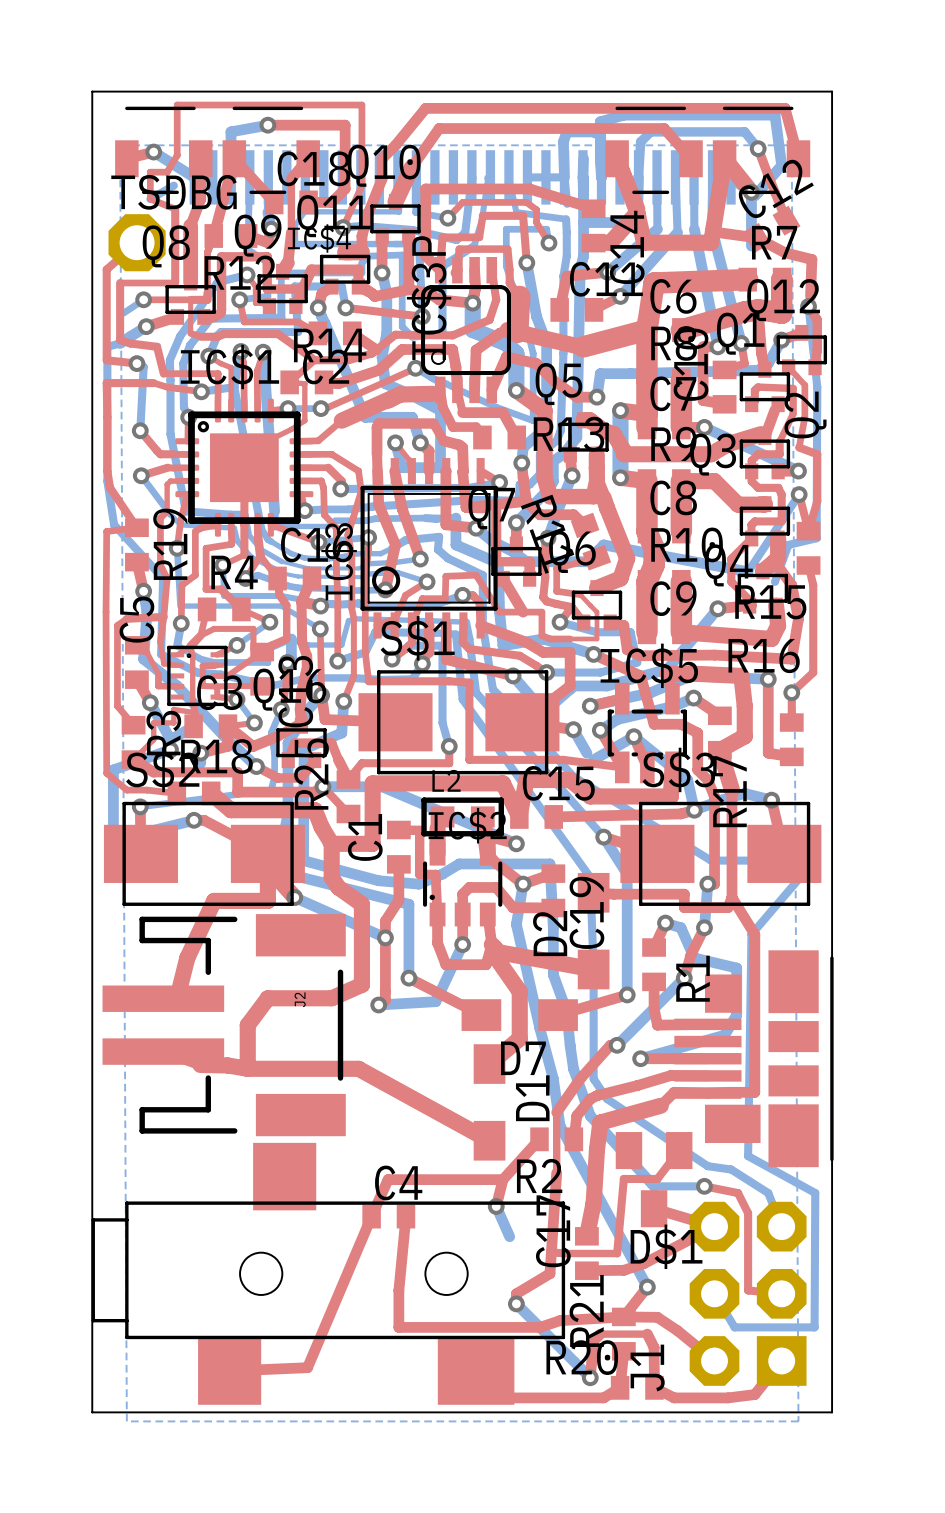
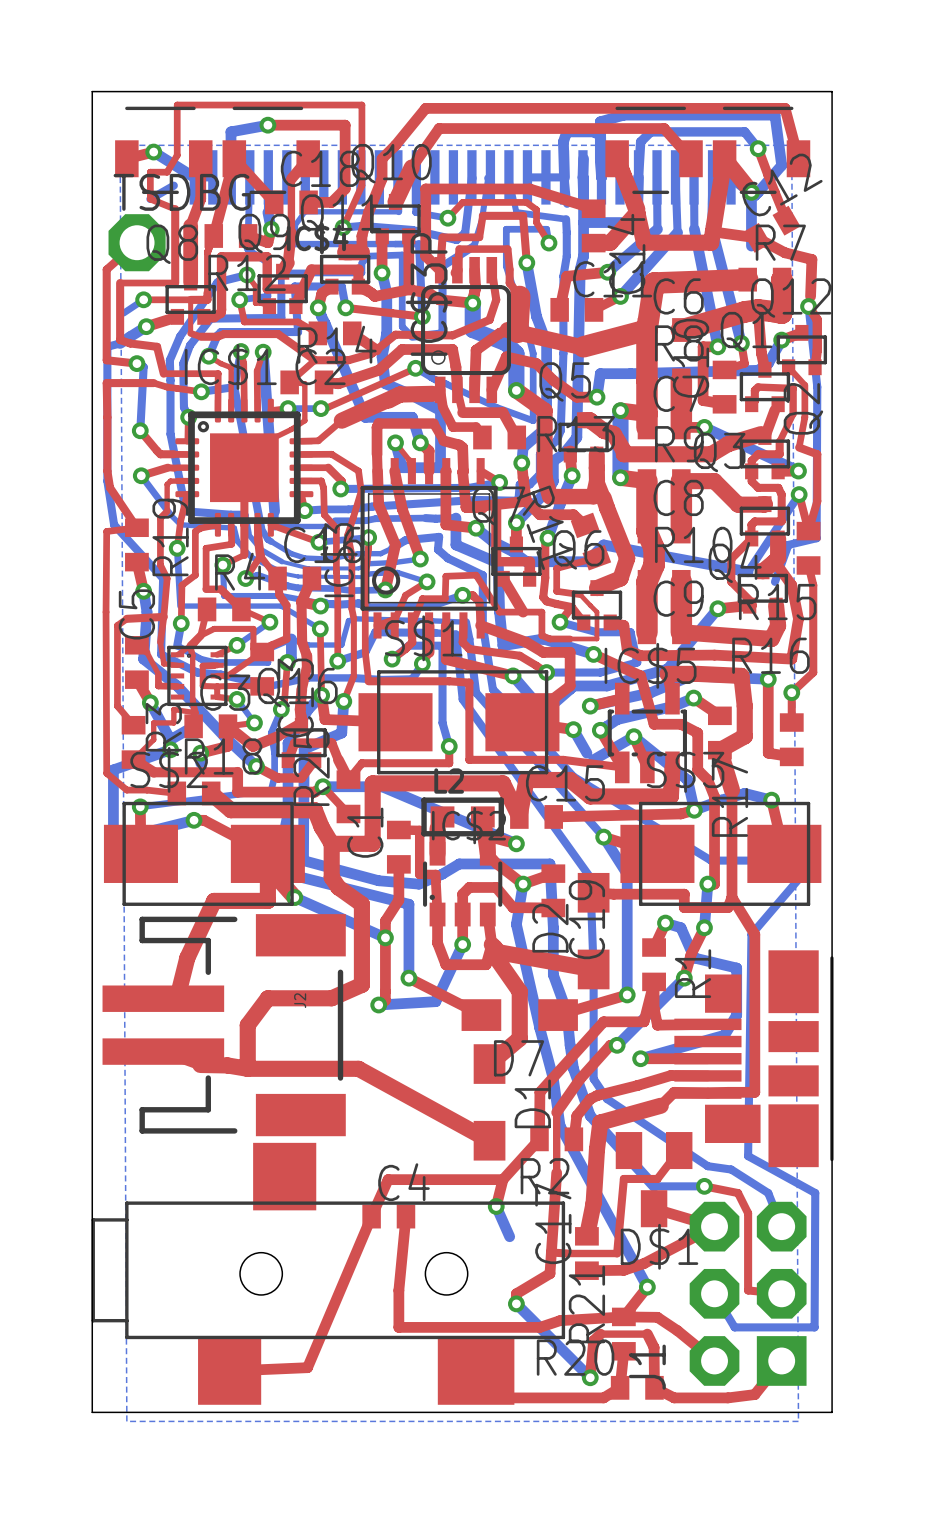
top track: none -> (654, 981) (644, 1021) (603, 1021) (539, 1092) (539, 1139)

